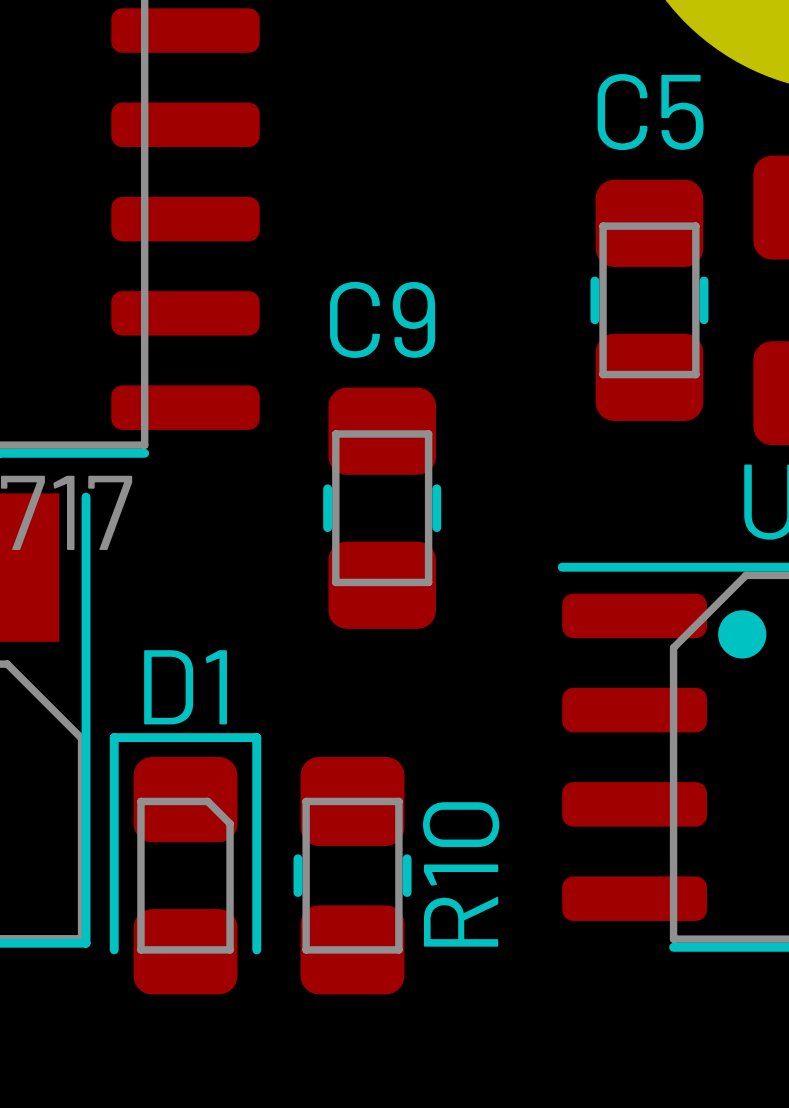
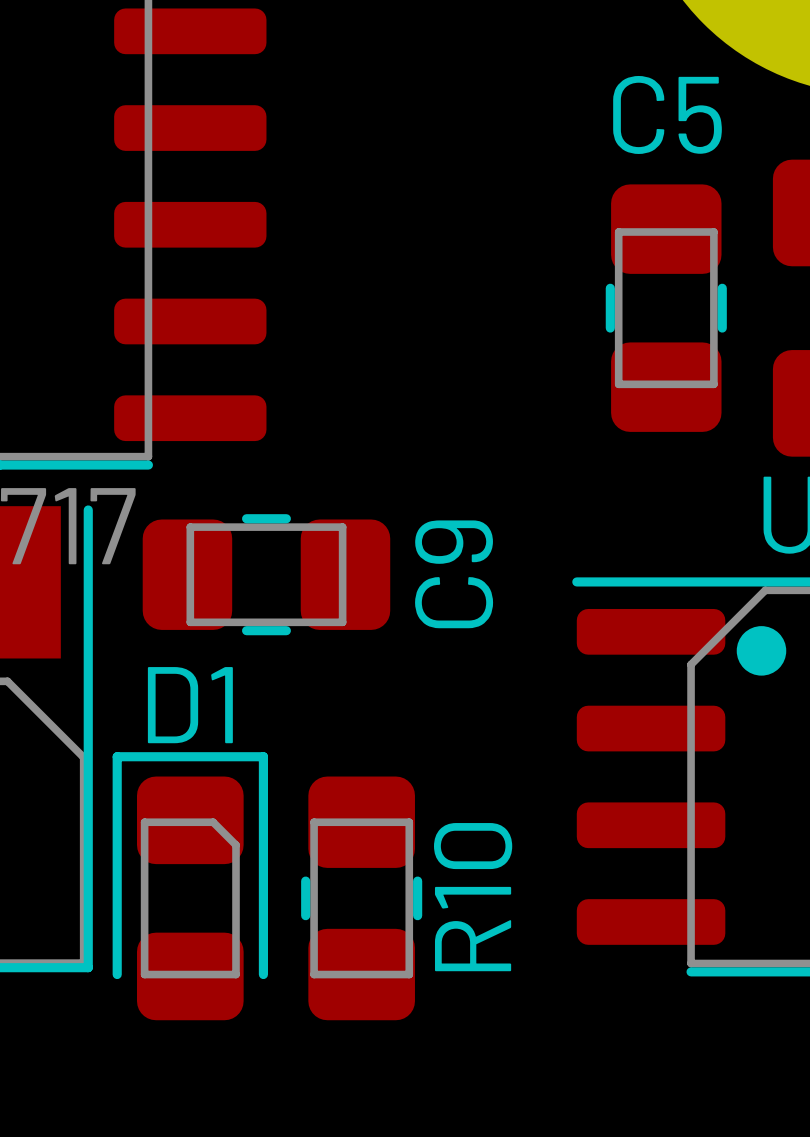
C9 rotation: 0° (382, 508) -> 90° clockwise (266, 574)

